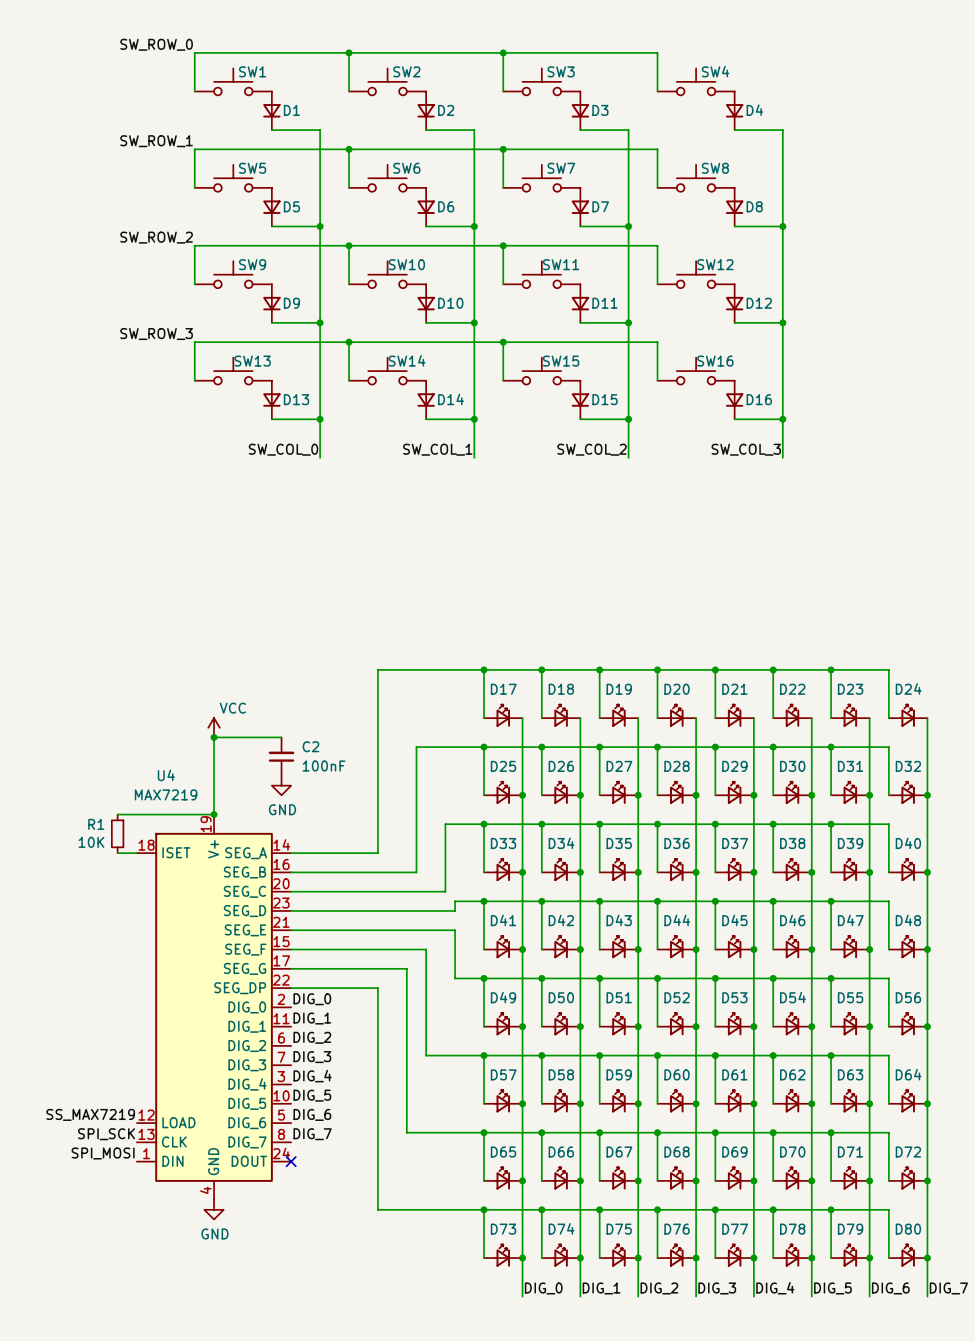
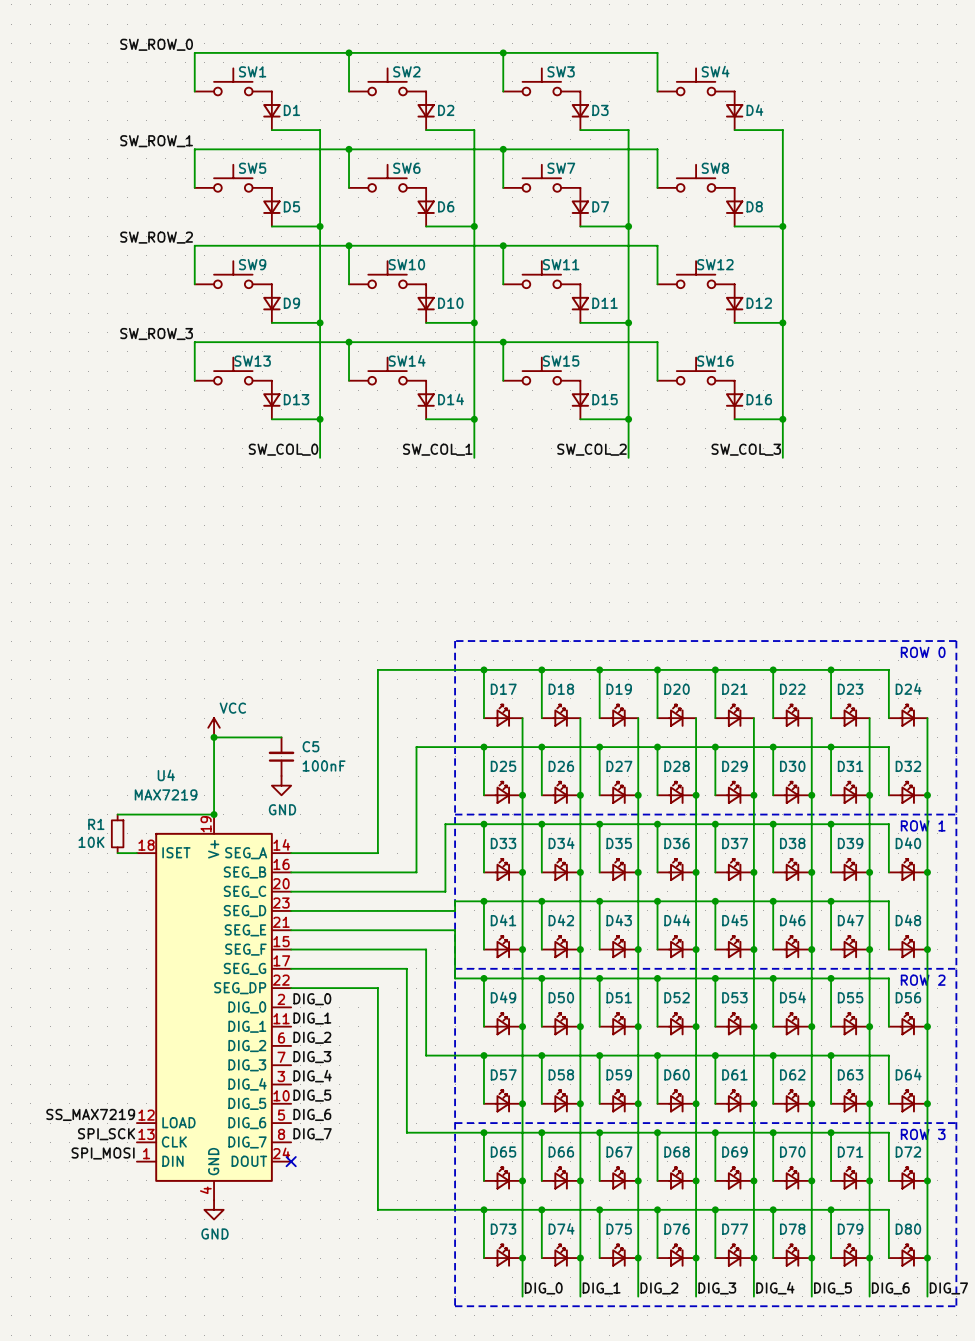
line: none -> (455, 641) (956, 641) (956, 1306) (455, 1306) (455, 641)
text: none -> ROW 0 (923, 652)
C2 name: C2 (310, 746) -> C5 (310, 746)
line: none -> (455, 814) (956, 814)
text: none -> ROW 1 (923, 825)
line: none -> (455, 968) (956, 968)
text: none -> ROW 2 (923, 980)
line: none -> (455, 1123) (956, 1123)
text: none -> ROW 3 (923, 1134)

